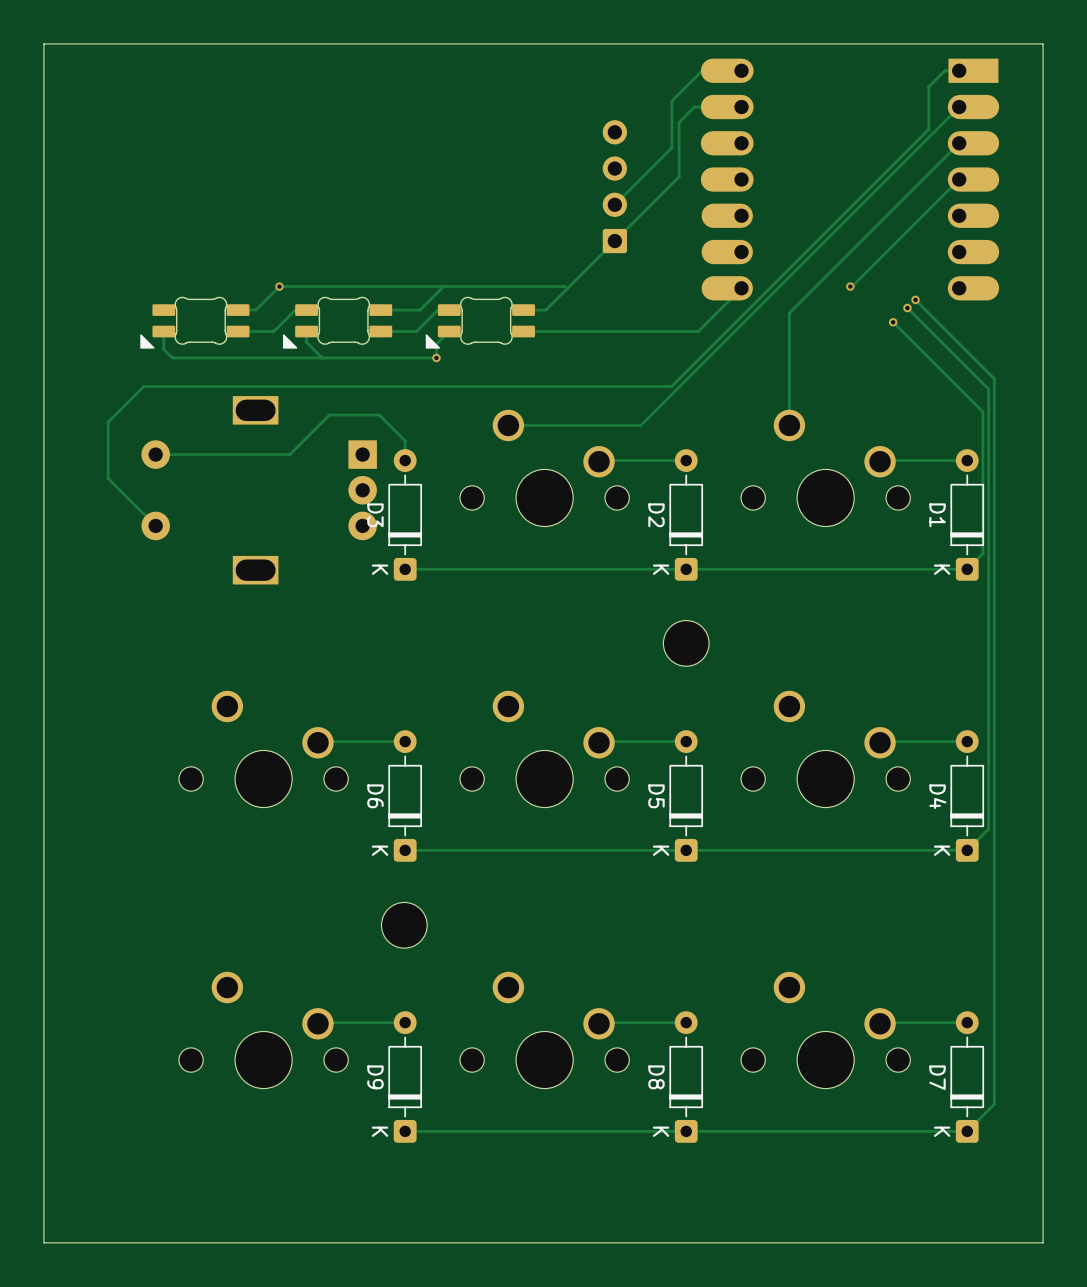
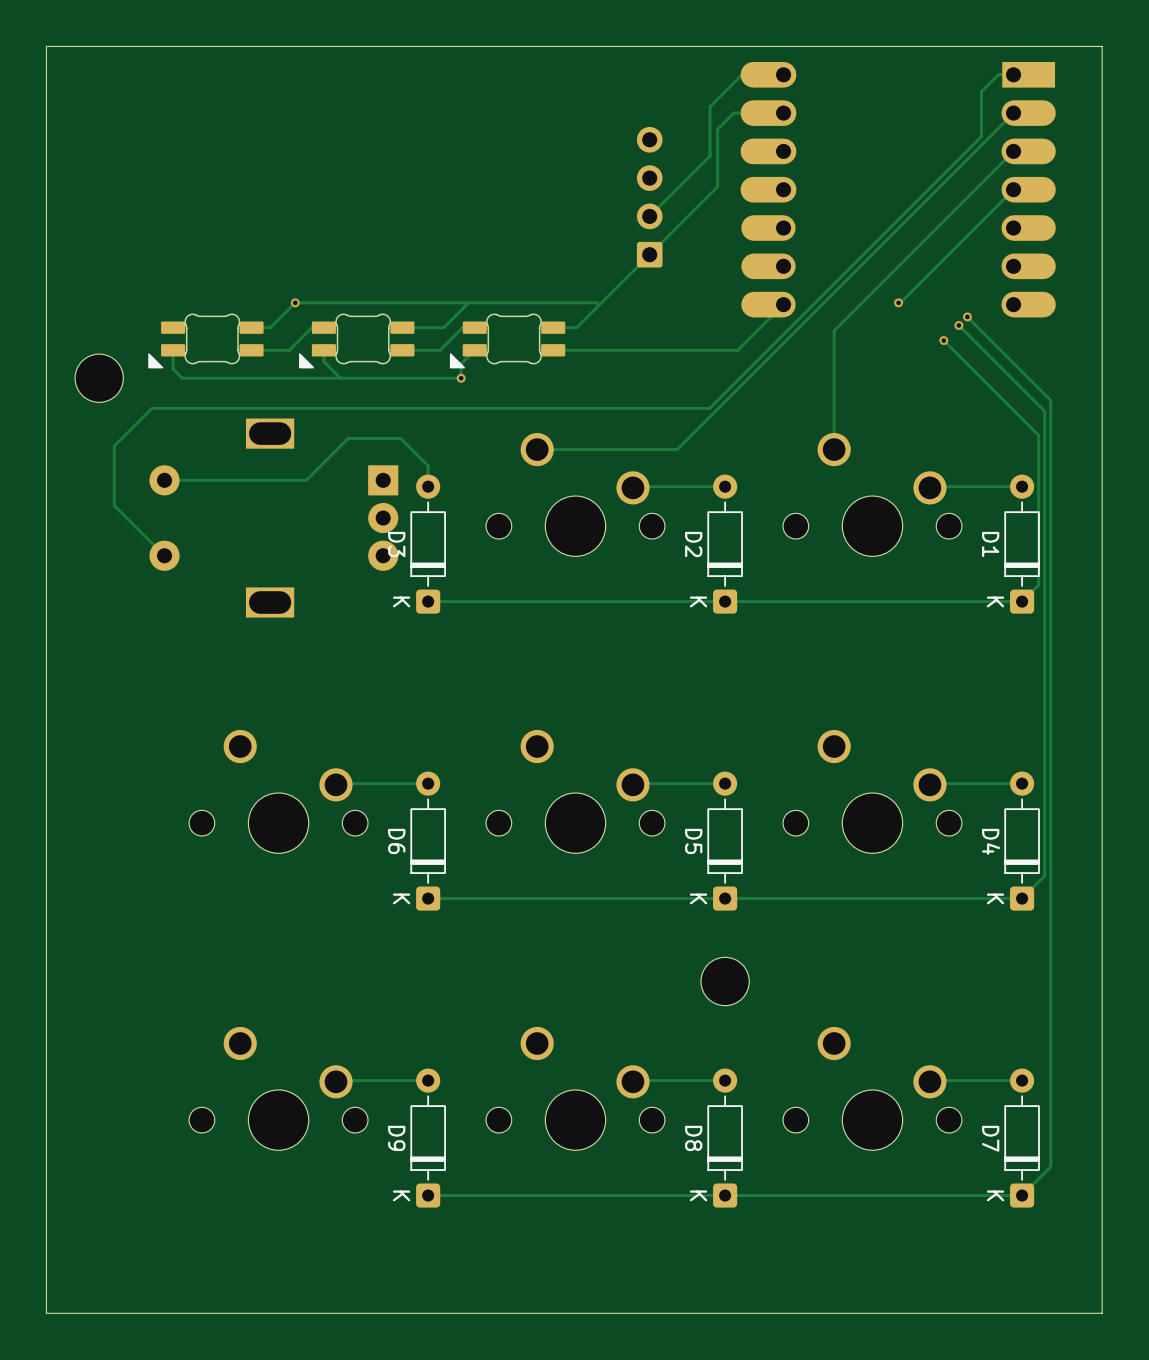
part: none -> (99, 378)
part: (686, 643) -> none
part: (404, 925) -> none
part: none -> (725, 981)

